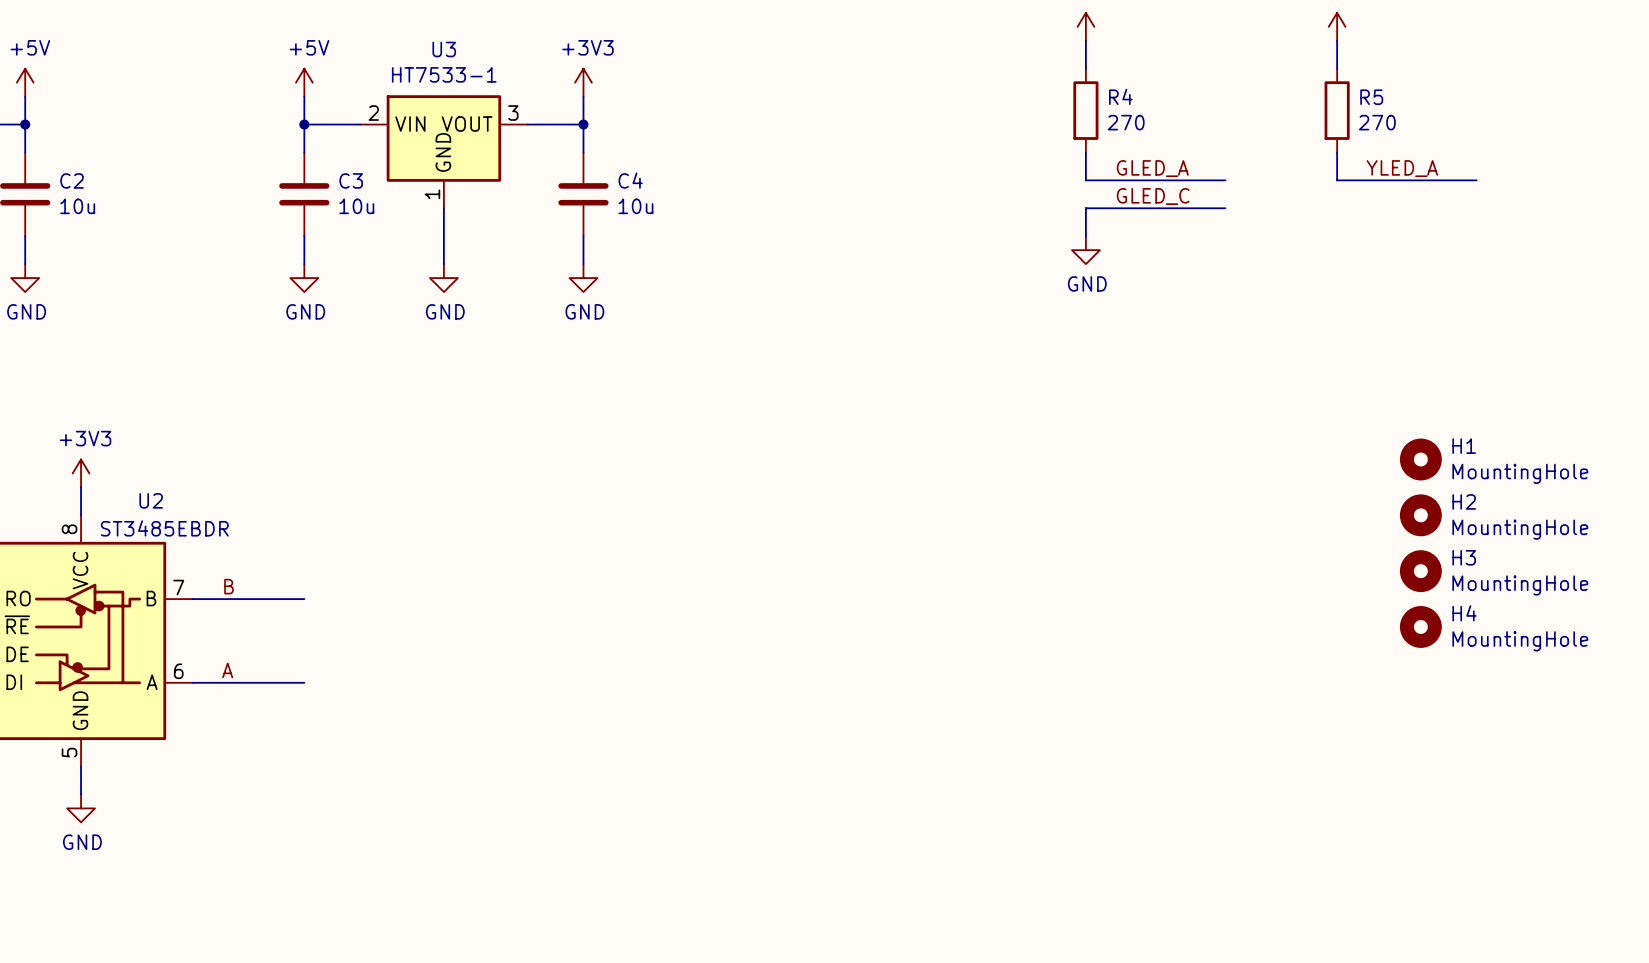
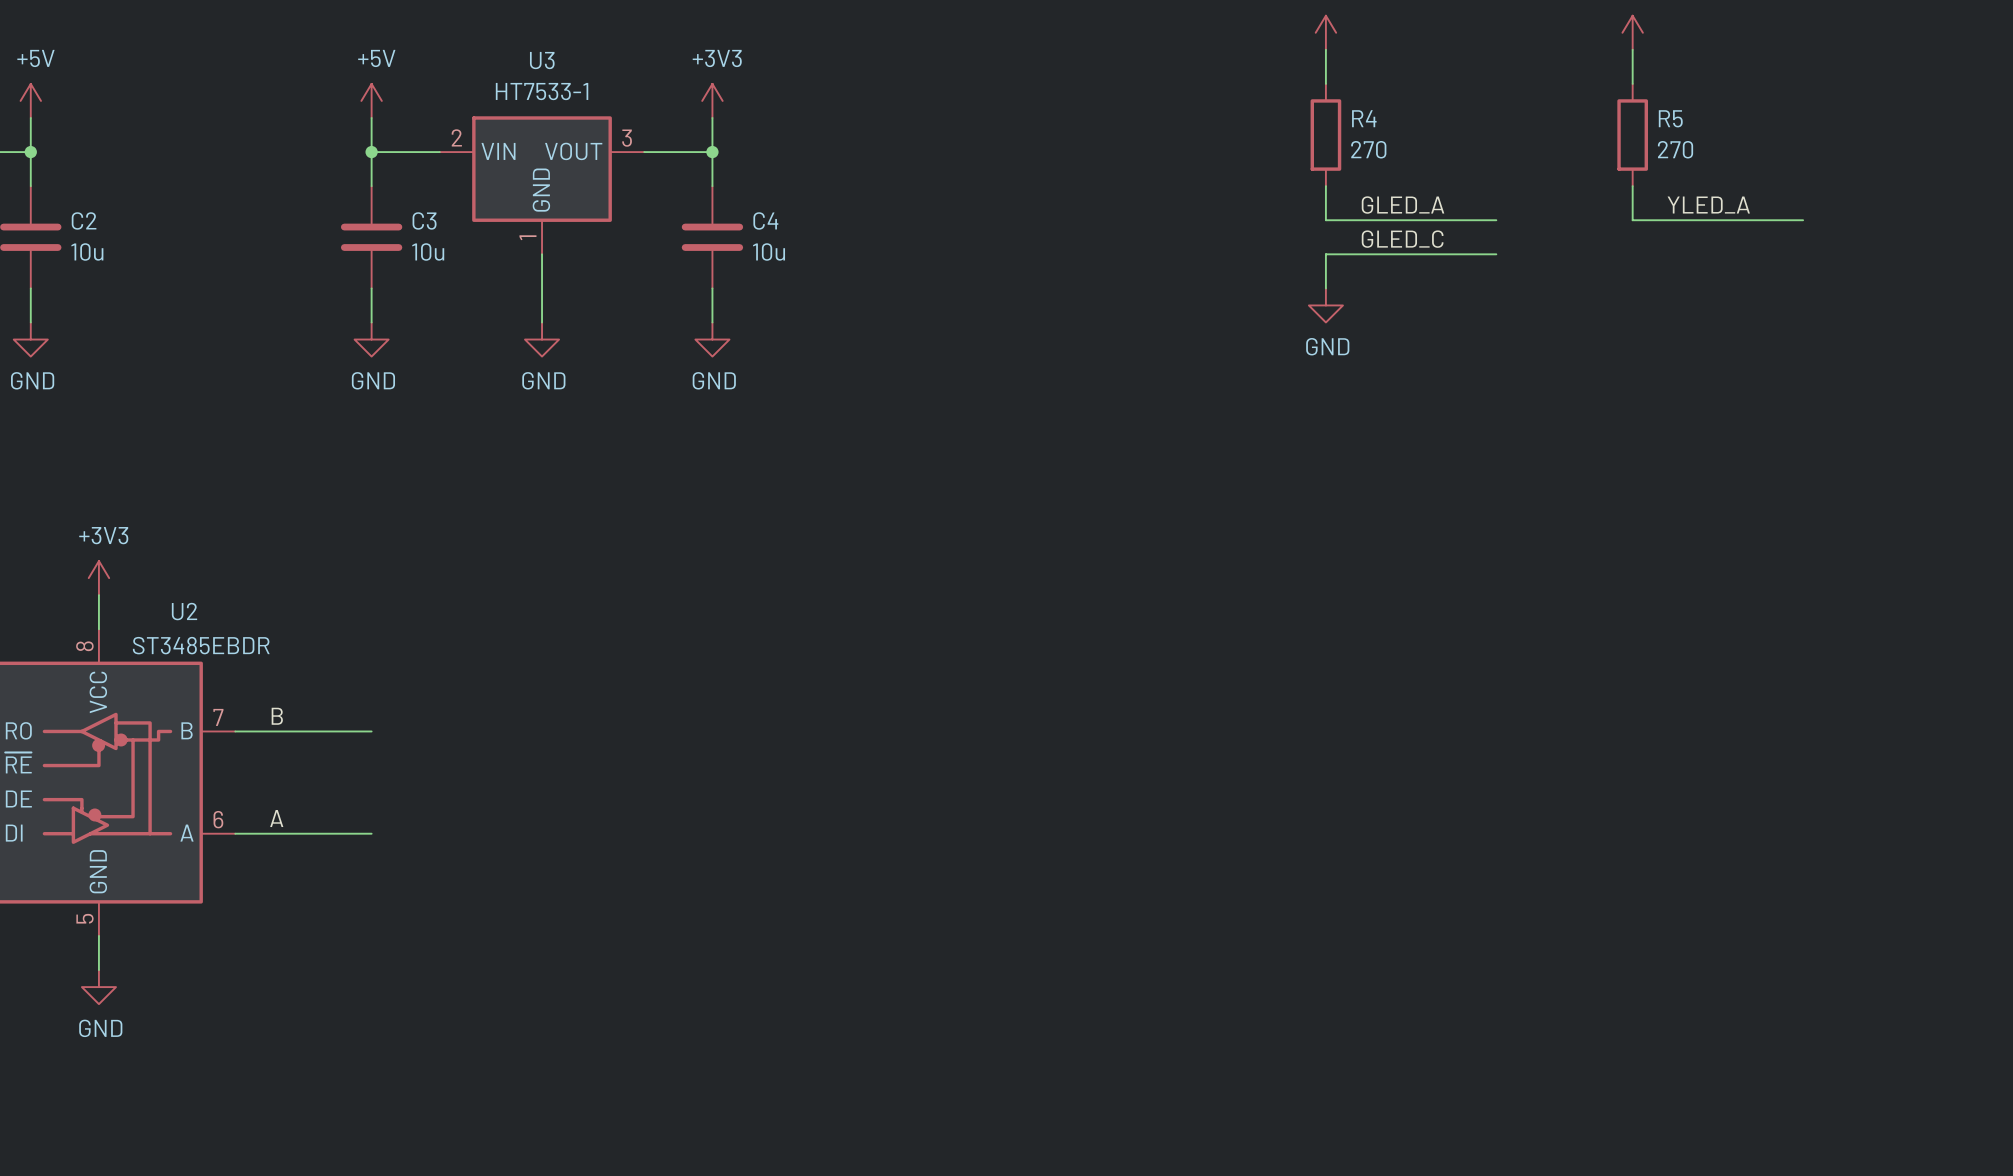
H1: MountingHole (1420, 459) -> none
H2: MountingHole (1420, 515) -> none
H3: MountingHole (1420, 571) -> none
H4: MountingHole (1420, 626) -> none

